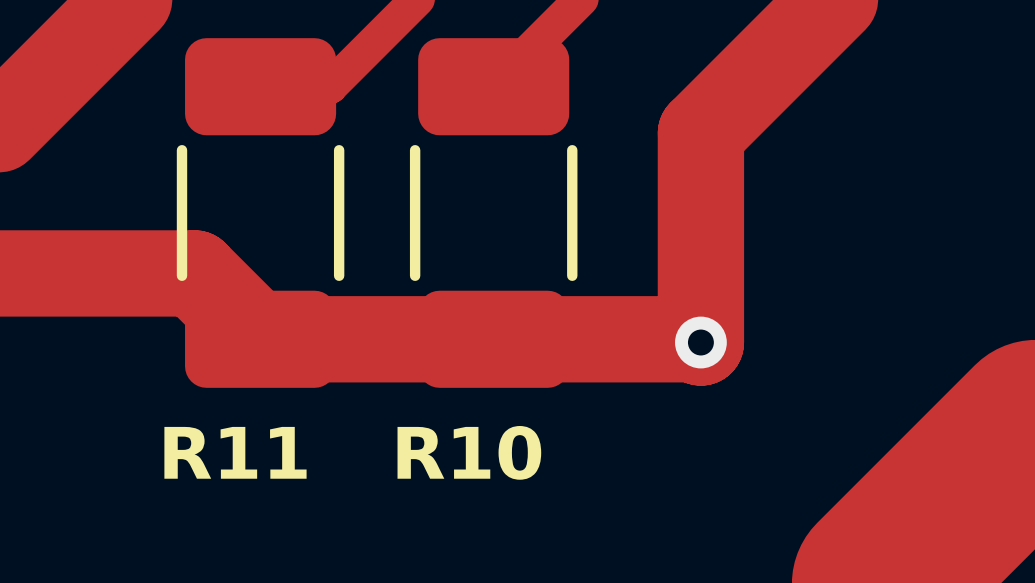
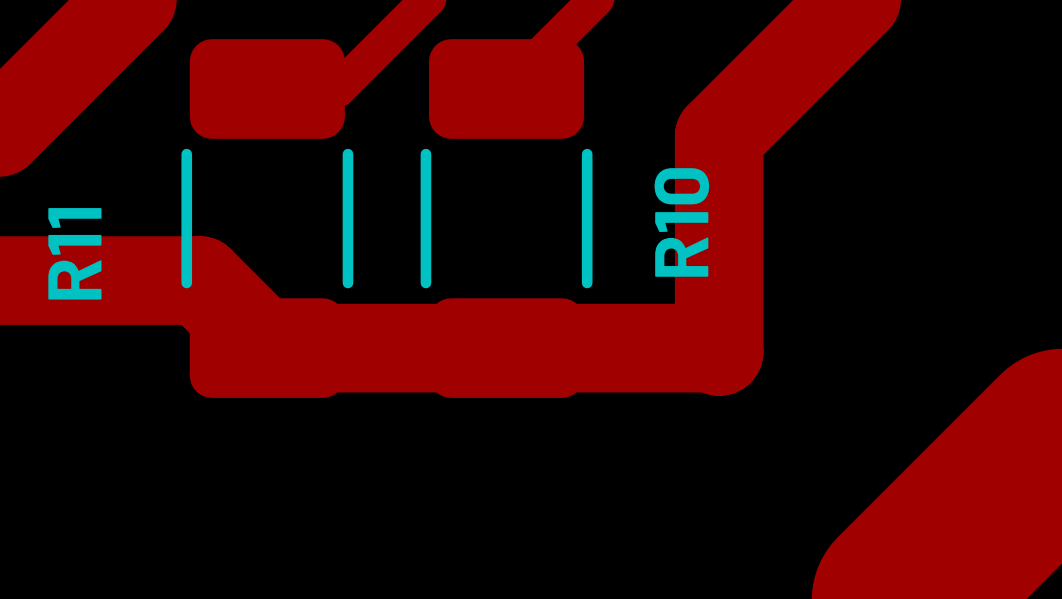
via: (700, 342) -> none
R11 name rotation: 0° (235, 452) -> 90° counterclockwise (74, 253)
R11 name position: R11 (235, 452) -> R11 (74, 253)
R10 name rotation: 0° (469, 452) -> 90° counterclockwise (681, 222)
R10 name position: R10 (469, 452) -> R10 (681, 222)

